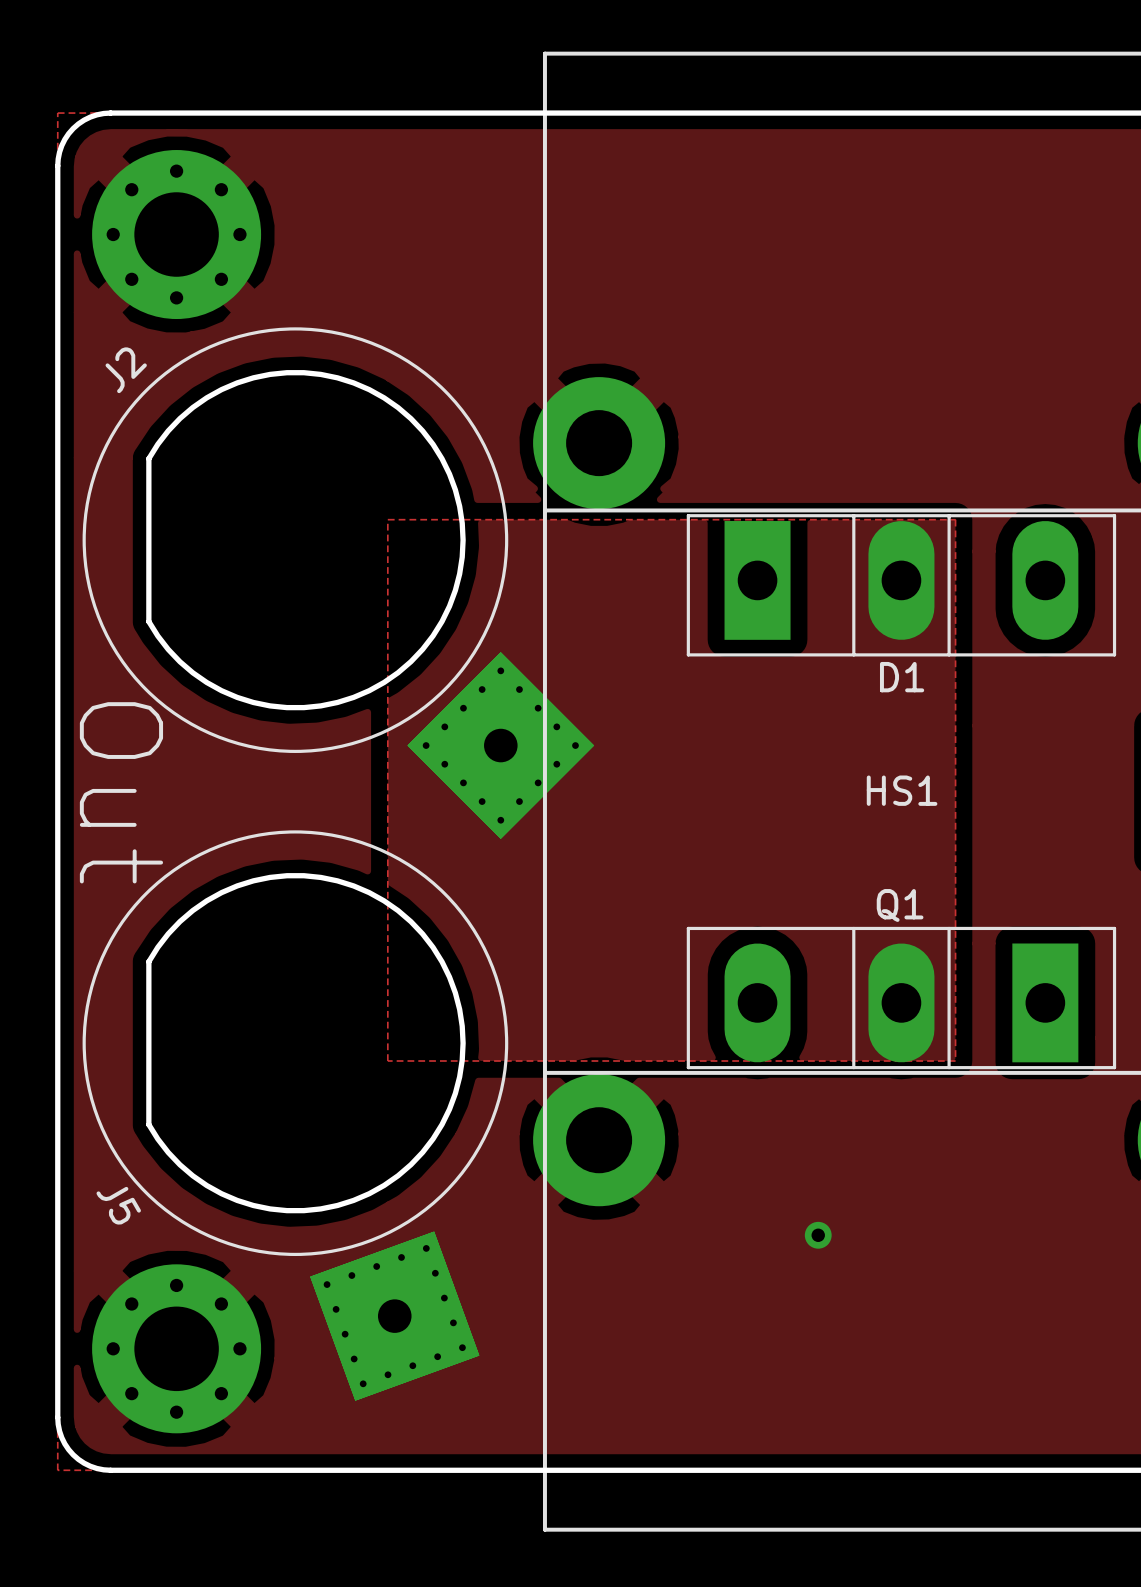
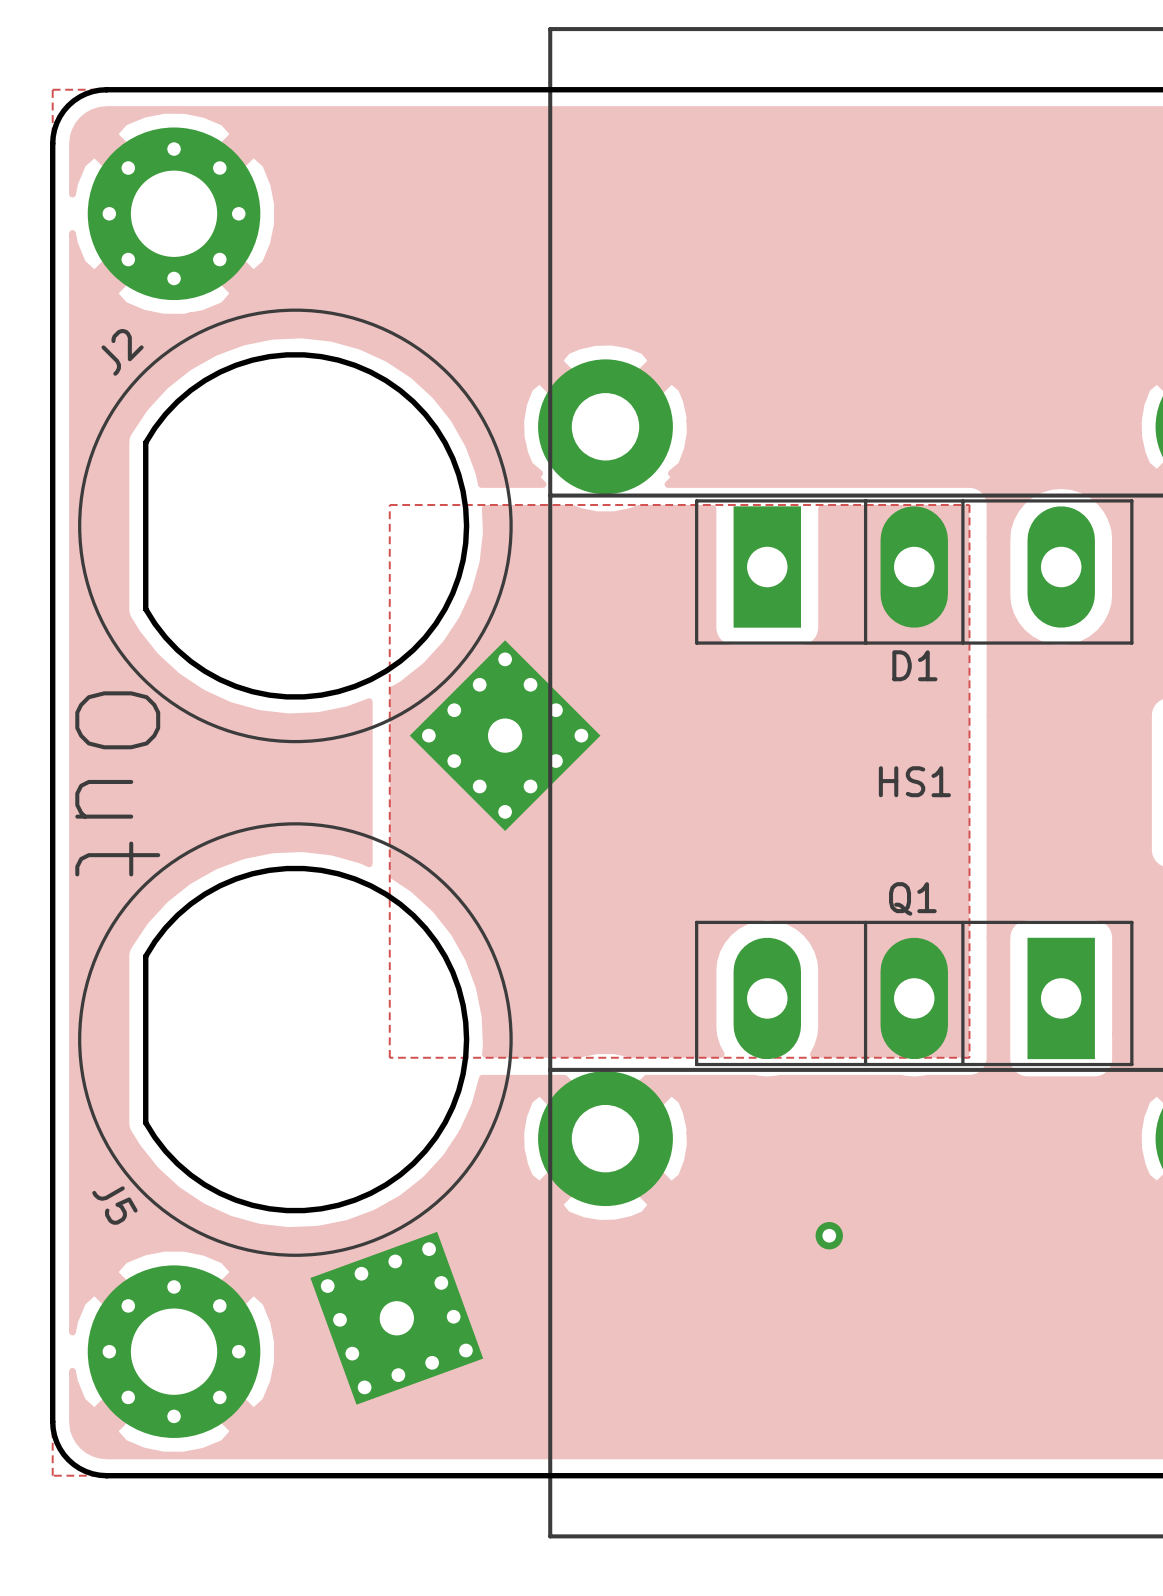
J2 footprint: [82, 327, 595, 839] -> [78, 308, 601, 831]
J5 footprint: [82, 830, 509, 1401] -> [78, 822, 513, 1405]

